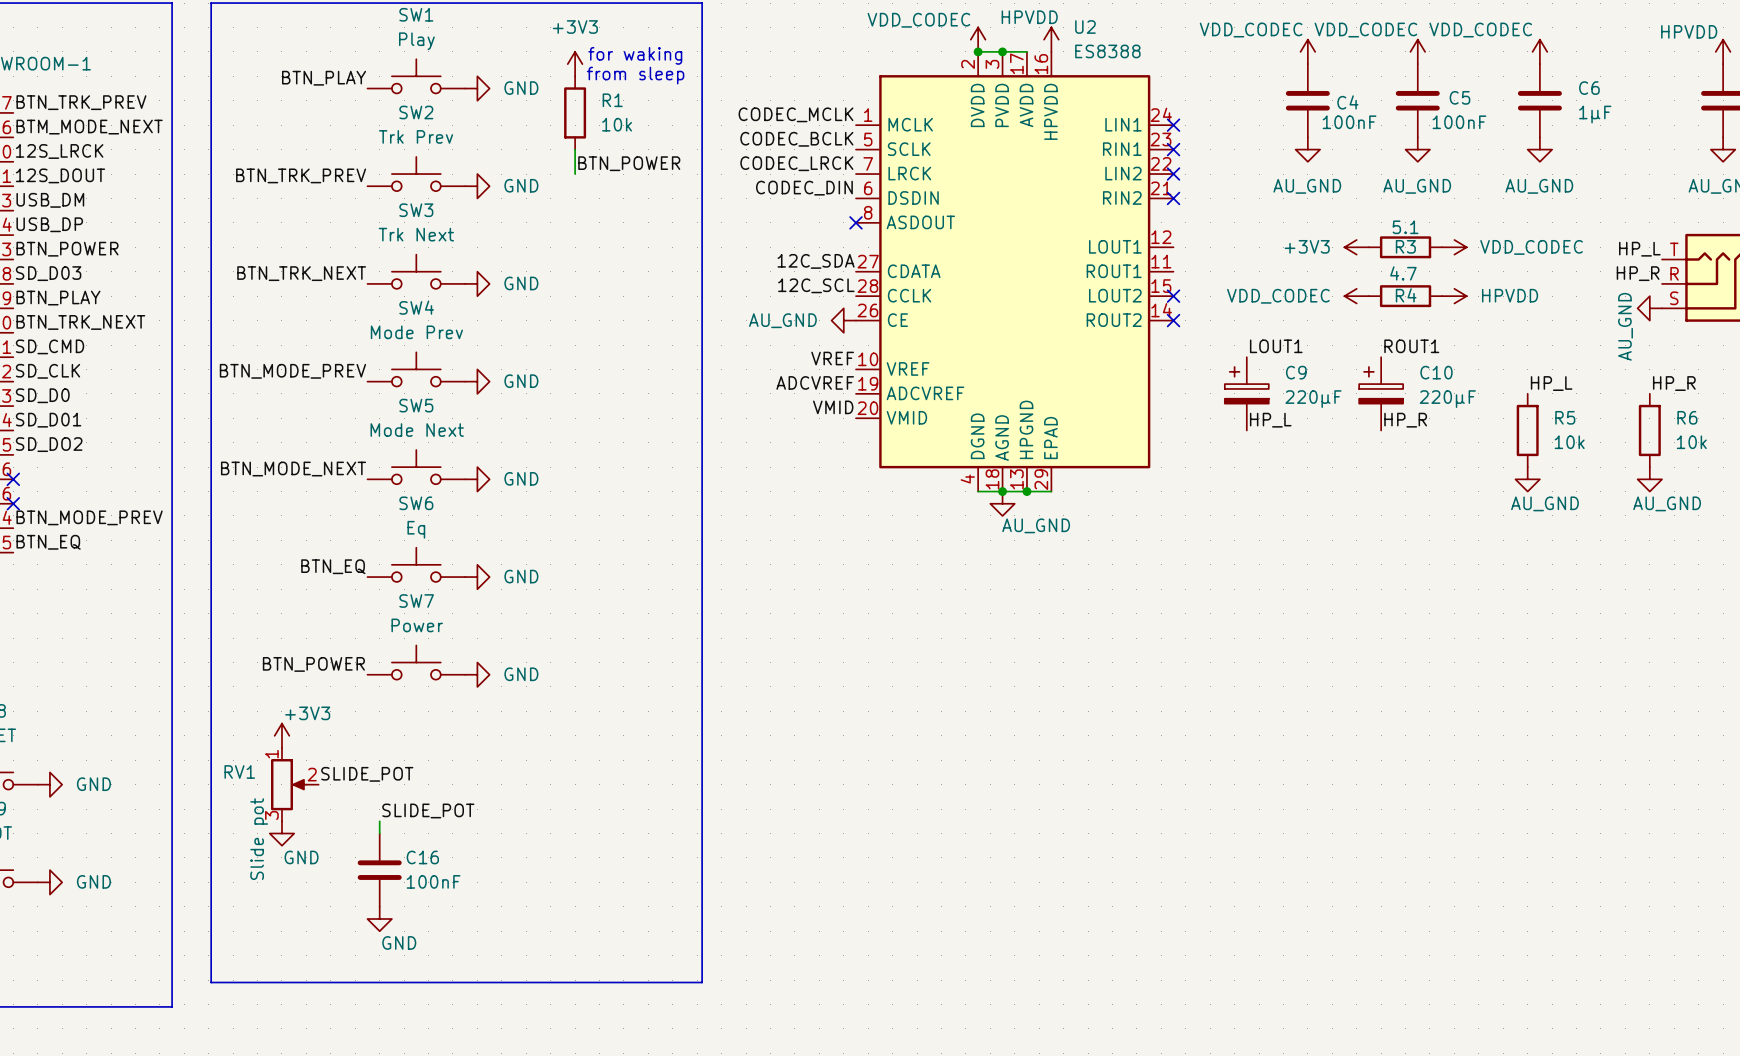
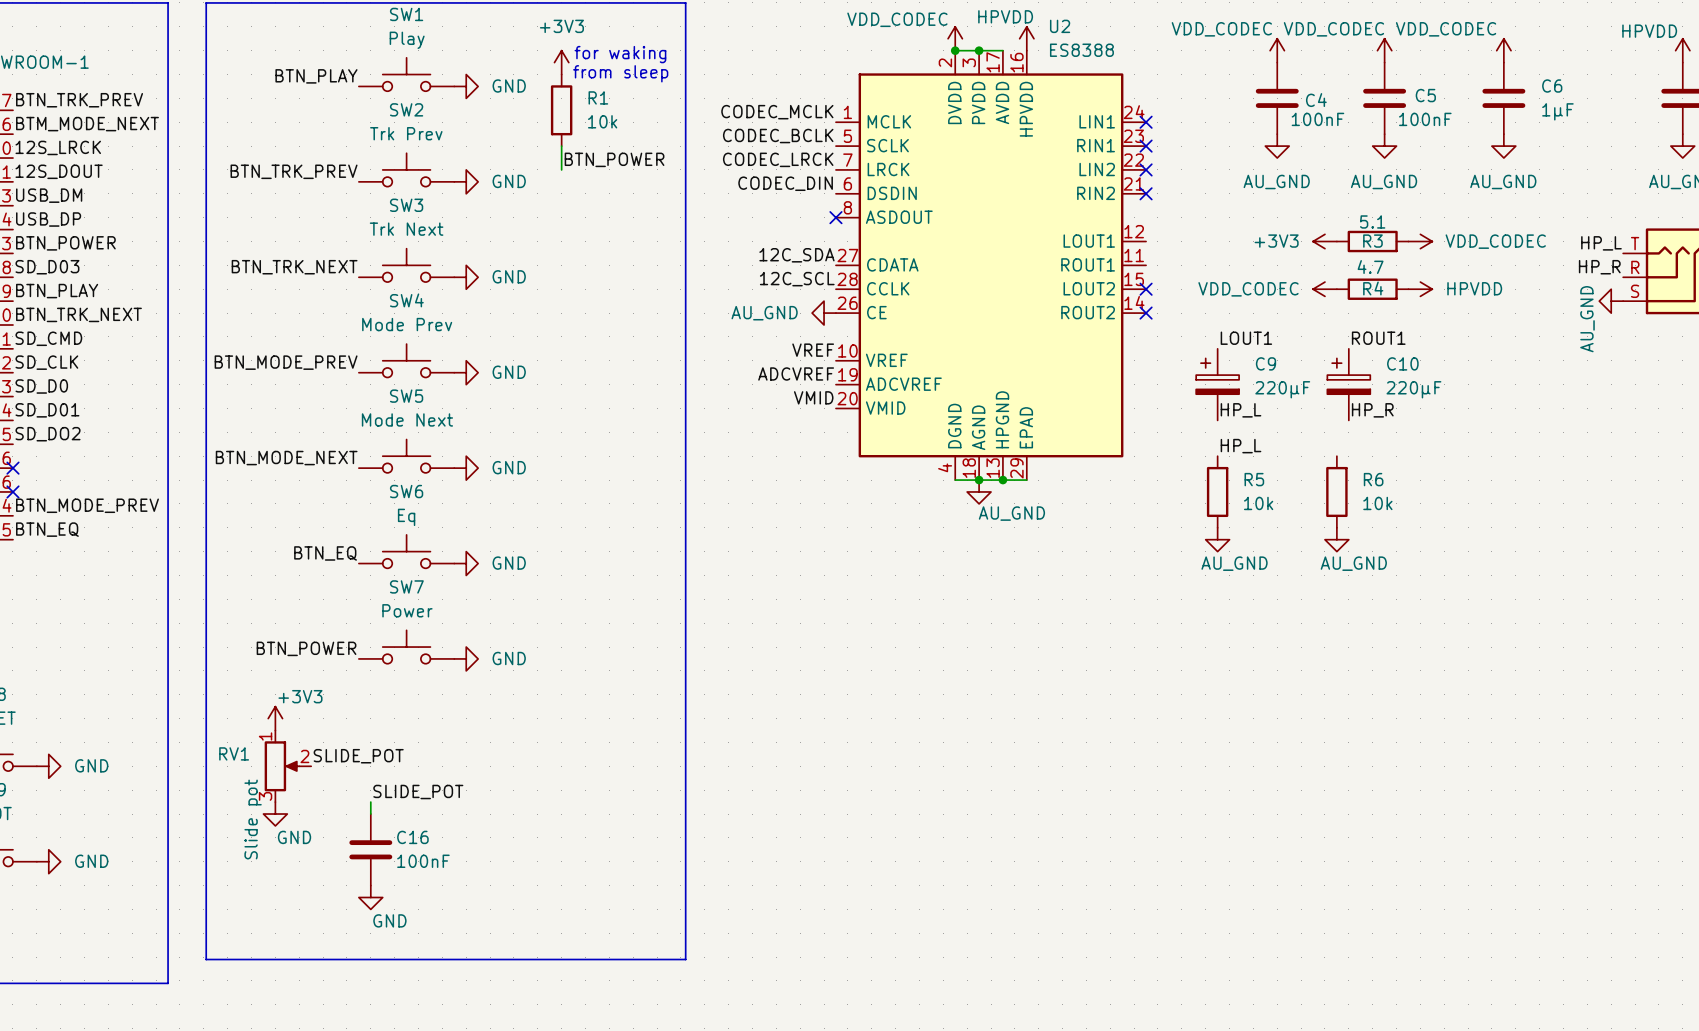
label: HP_L (1551, 383) -> none
label: HP_R (1674, 383) -> none
R5 position: (1527, 430) -> (1217, 491)
R6 position: (1649, 430) -> (1336, 491)
label: none -> HP_L (1241, 446)
power symbol: AU_GND (1527, 479) -> none
power symbol: AU_GND (1649, 479) -> none
power symbol: none -> AU_GND (1217, 539)
power symbol: none -> AU_GND (1336, 539)

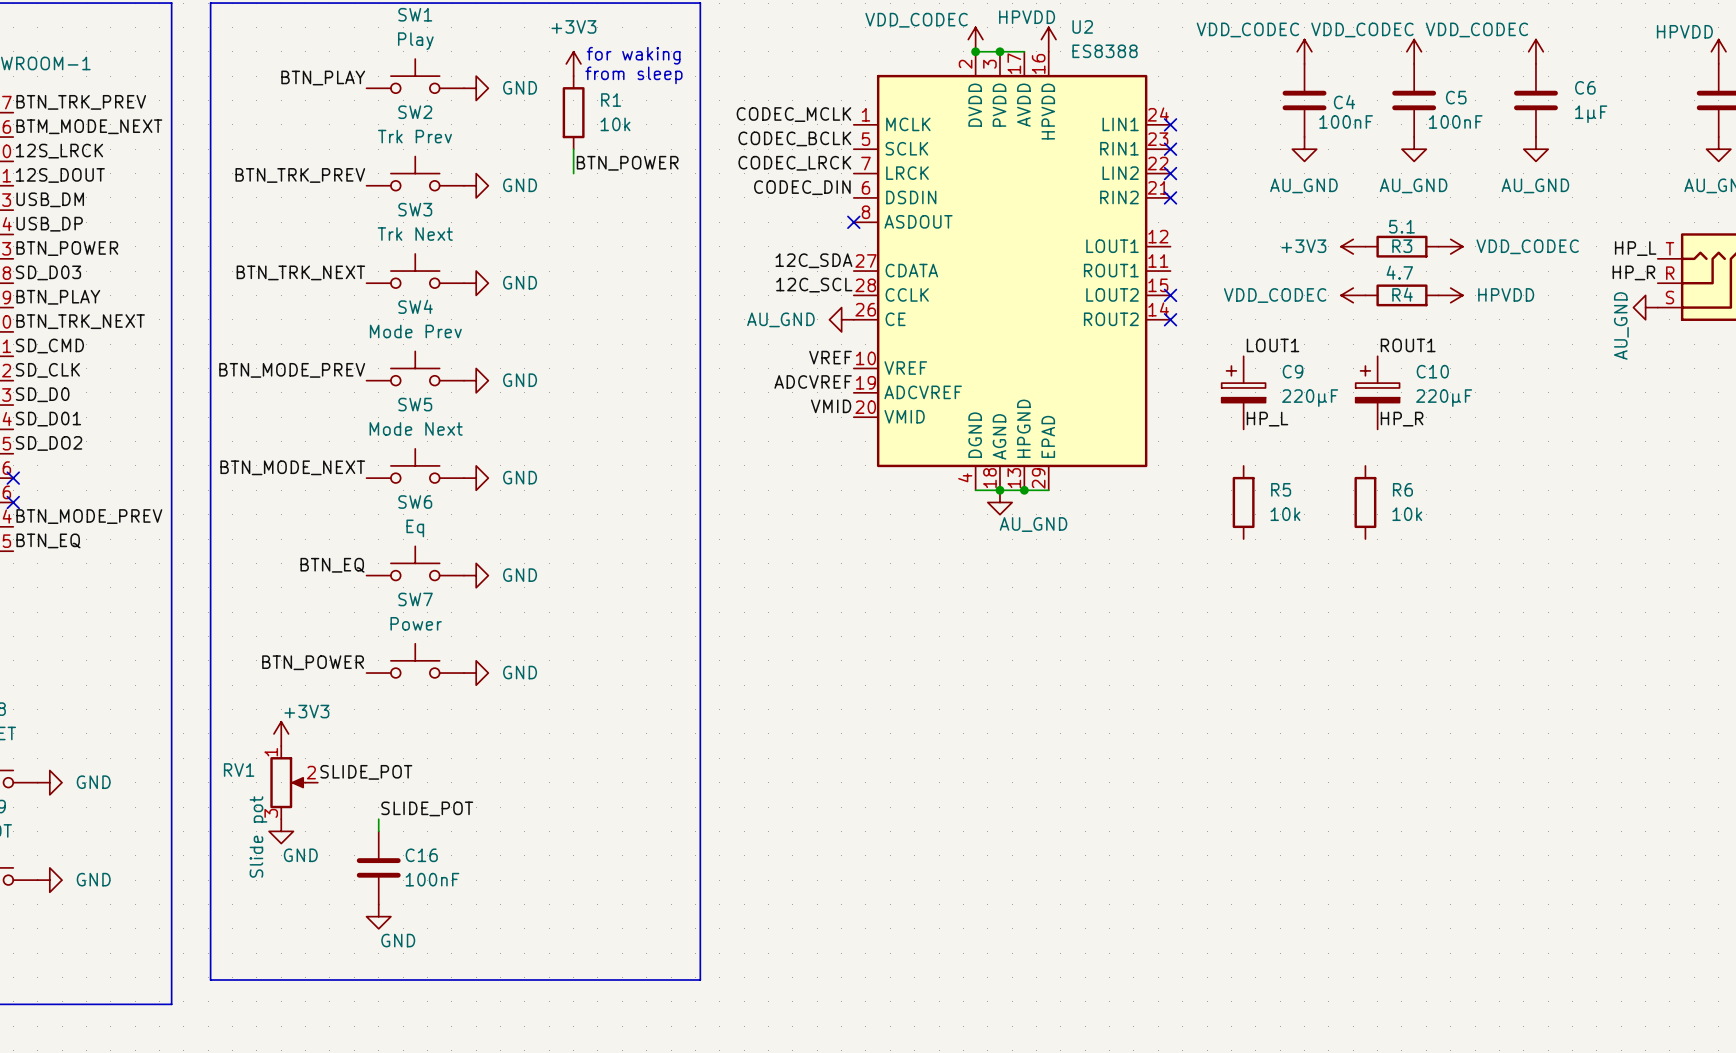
label: HP_L (1241, 446) -> none
power symbol: AU_GND (1217, 539) -> none
power symbol: AU_GND (1336, 539) -> none

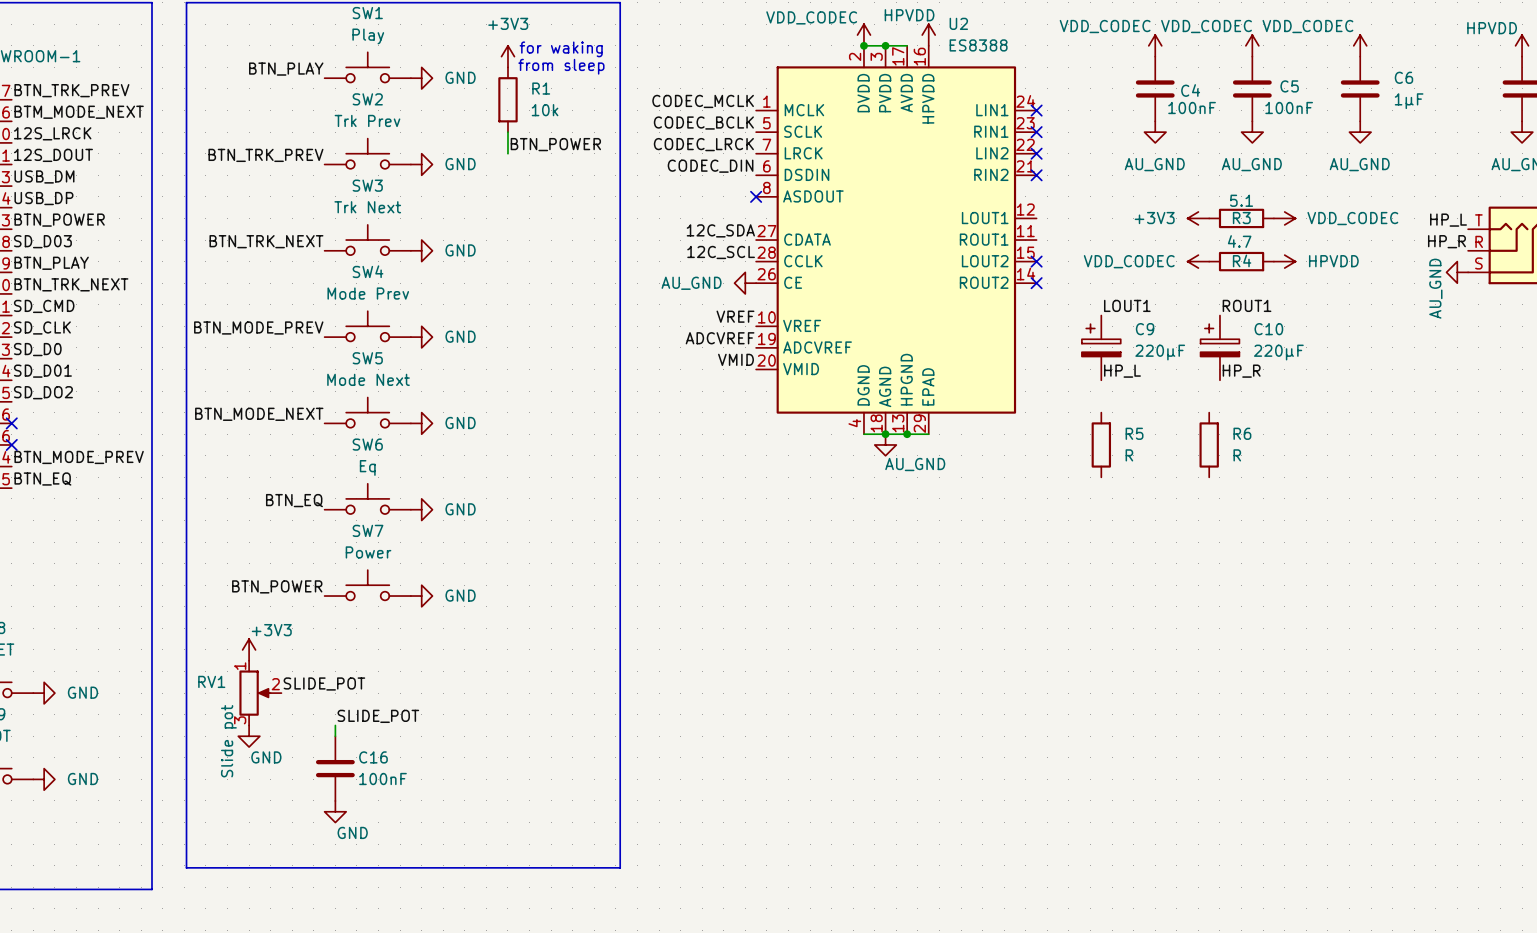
R5 value: 10k (1285, 514) -> R (1129, 455)
R6 value: 10k (1407, 514) -> R (1237, 455)

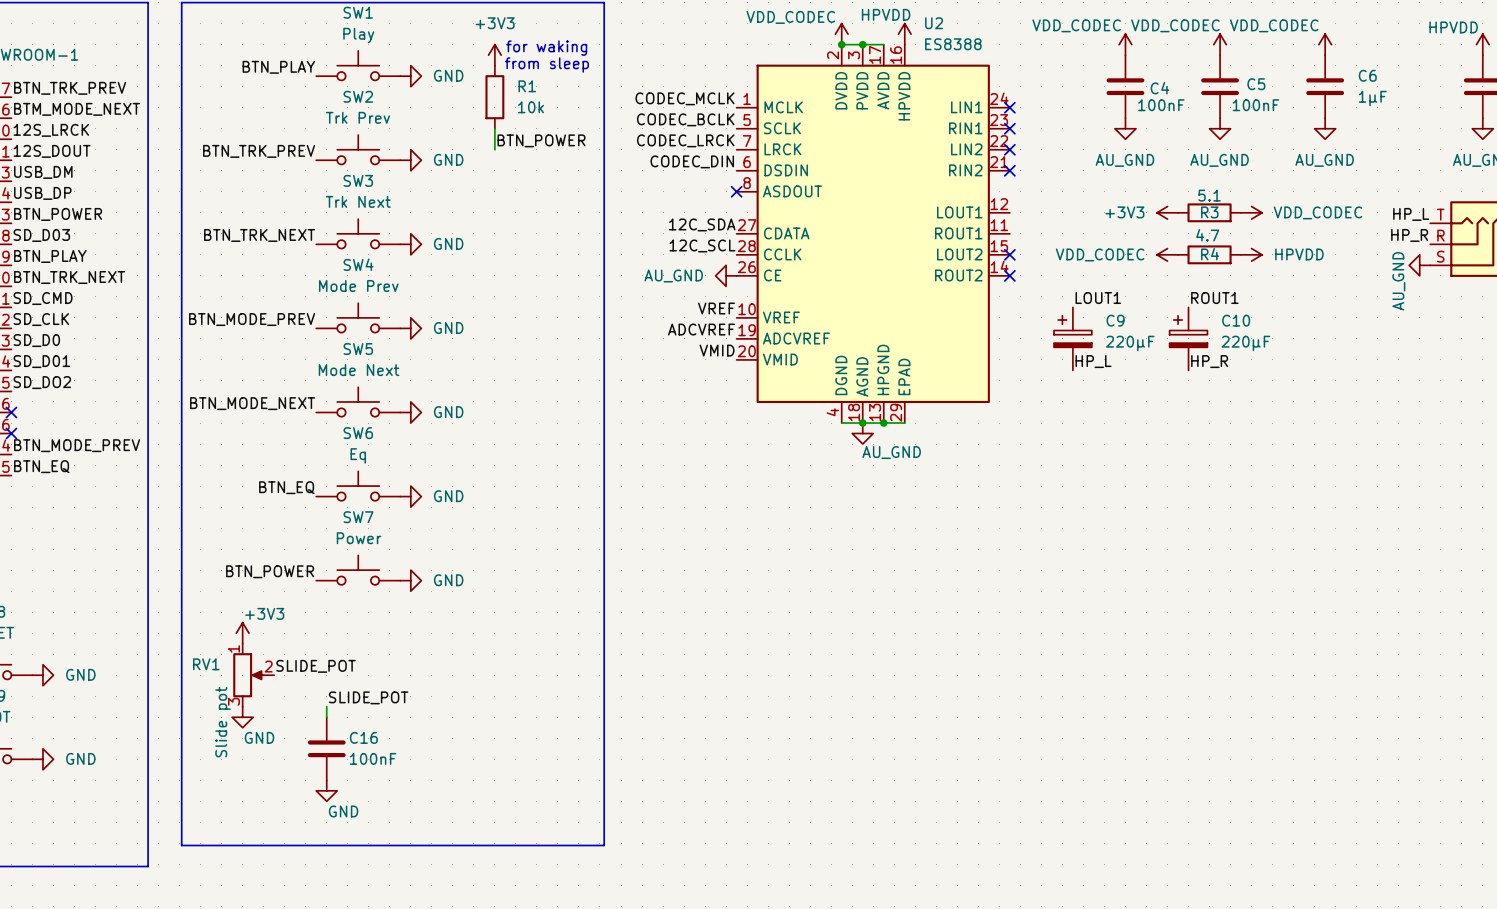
R5: R (1101, 444) -> none
R6: R (1209, 444) -> none

